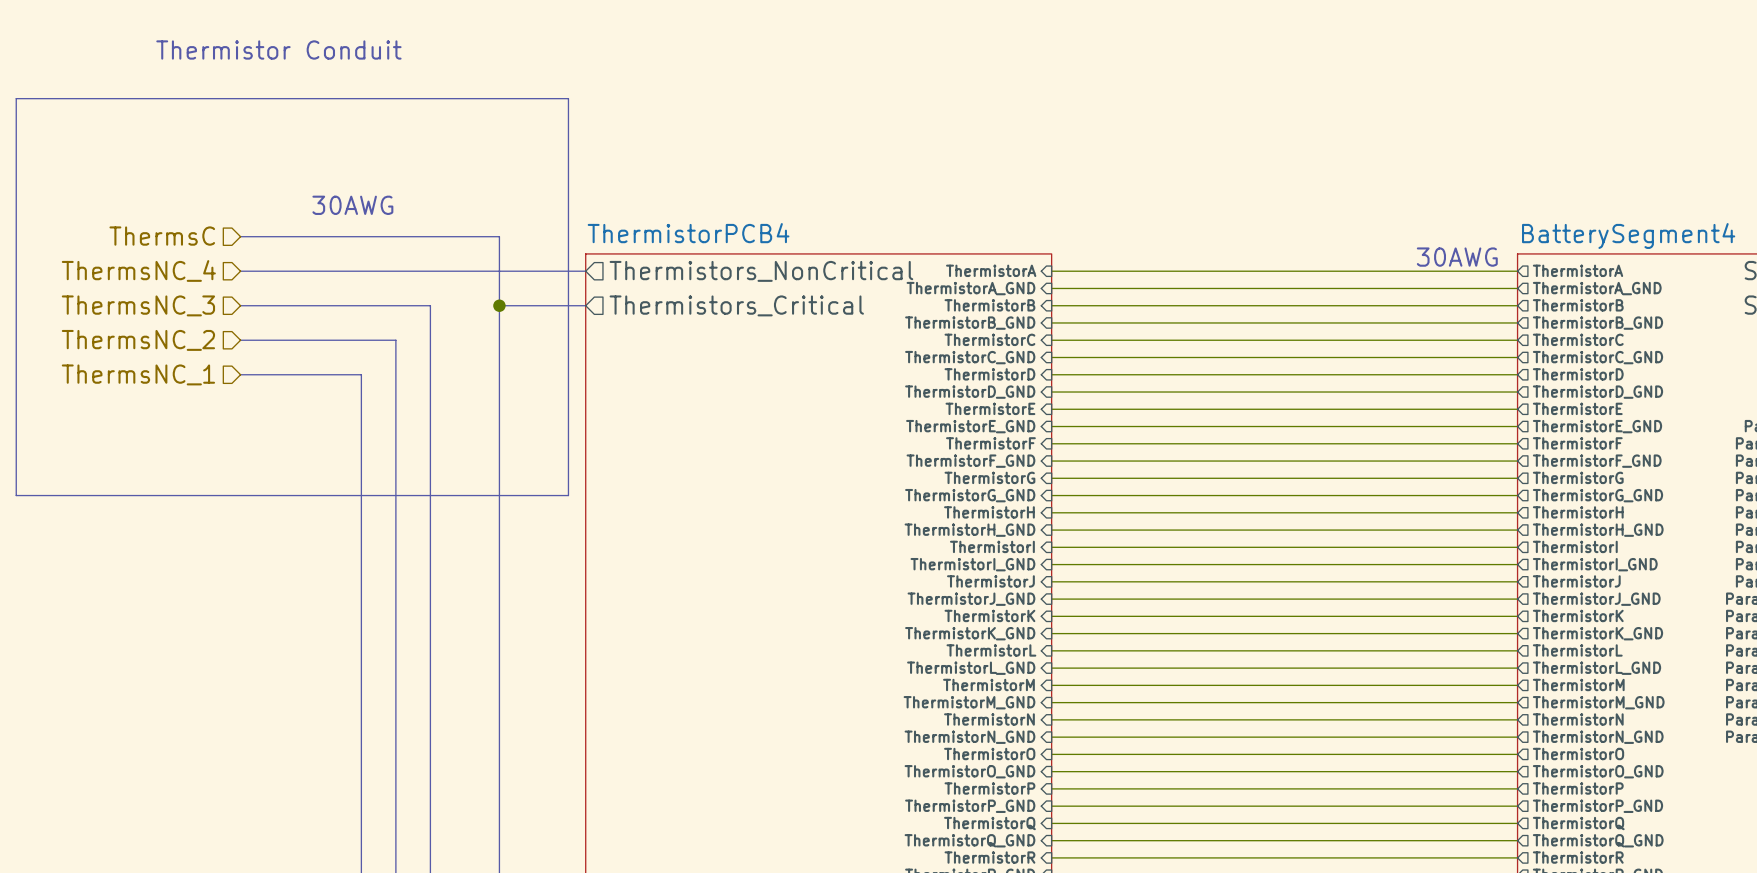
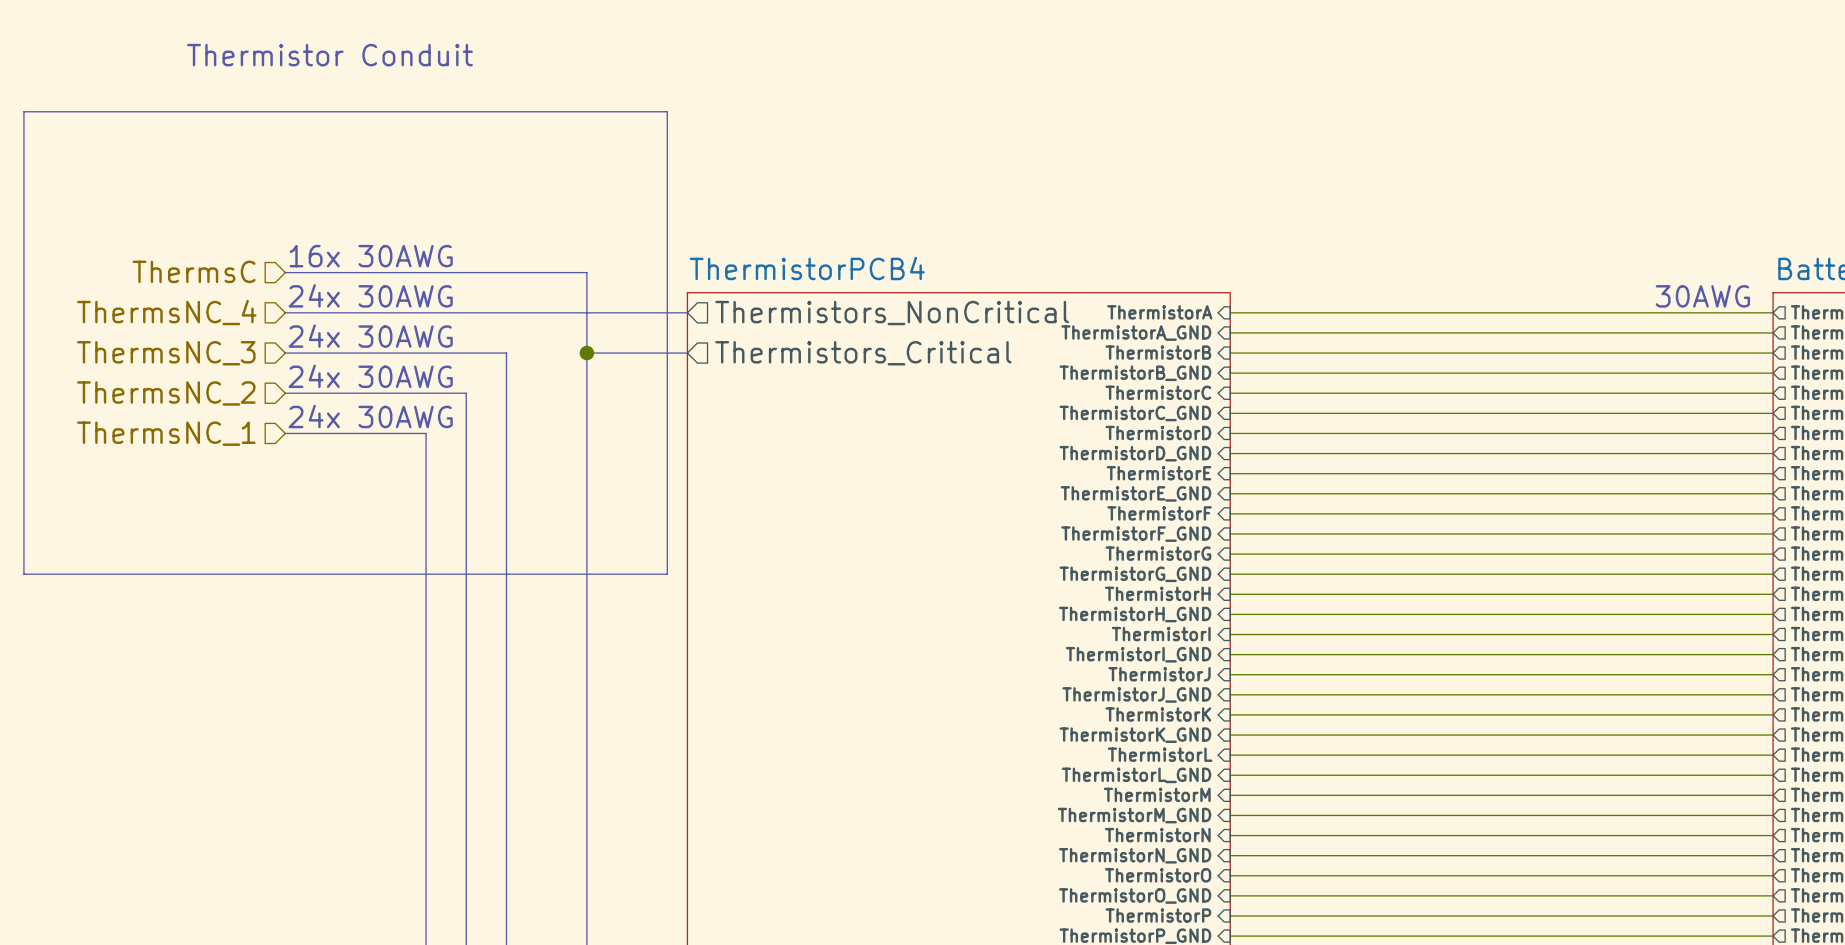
text: 30AWG (352, 205) -> 16x 30AWG (371, 256)
text: none -> 24x 30AWG (370, 295)
text: none -> 24x 30AWG (370, 336)
text: none -> 24x 30AWG (370, 376)
text: none -> 24x 30AWG (370, 416)

